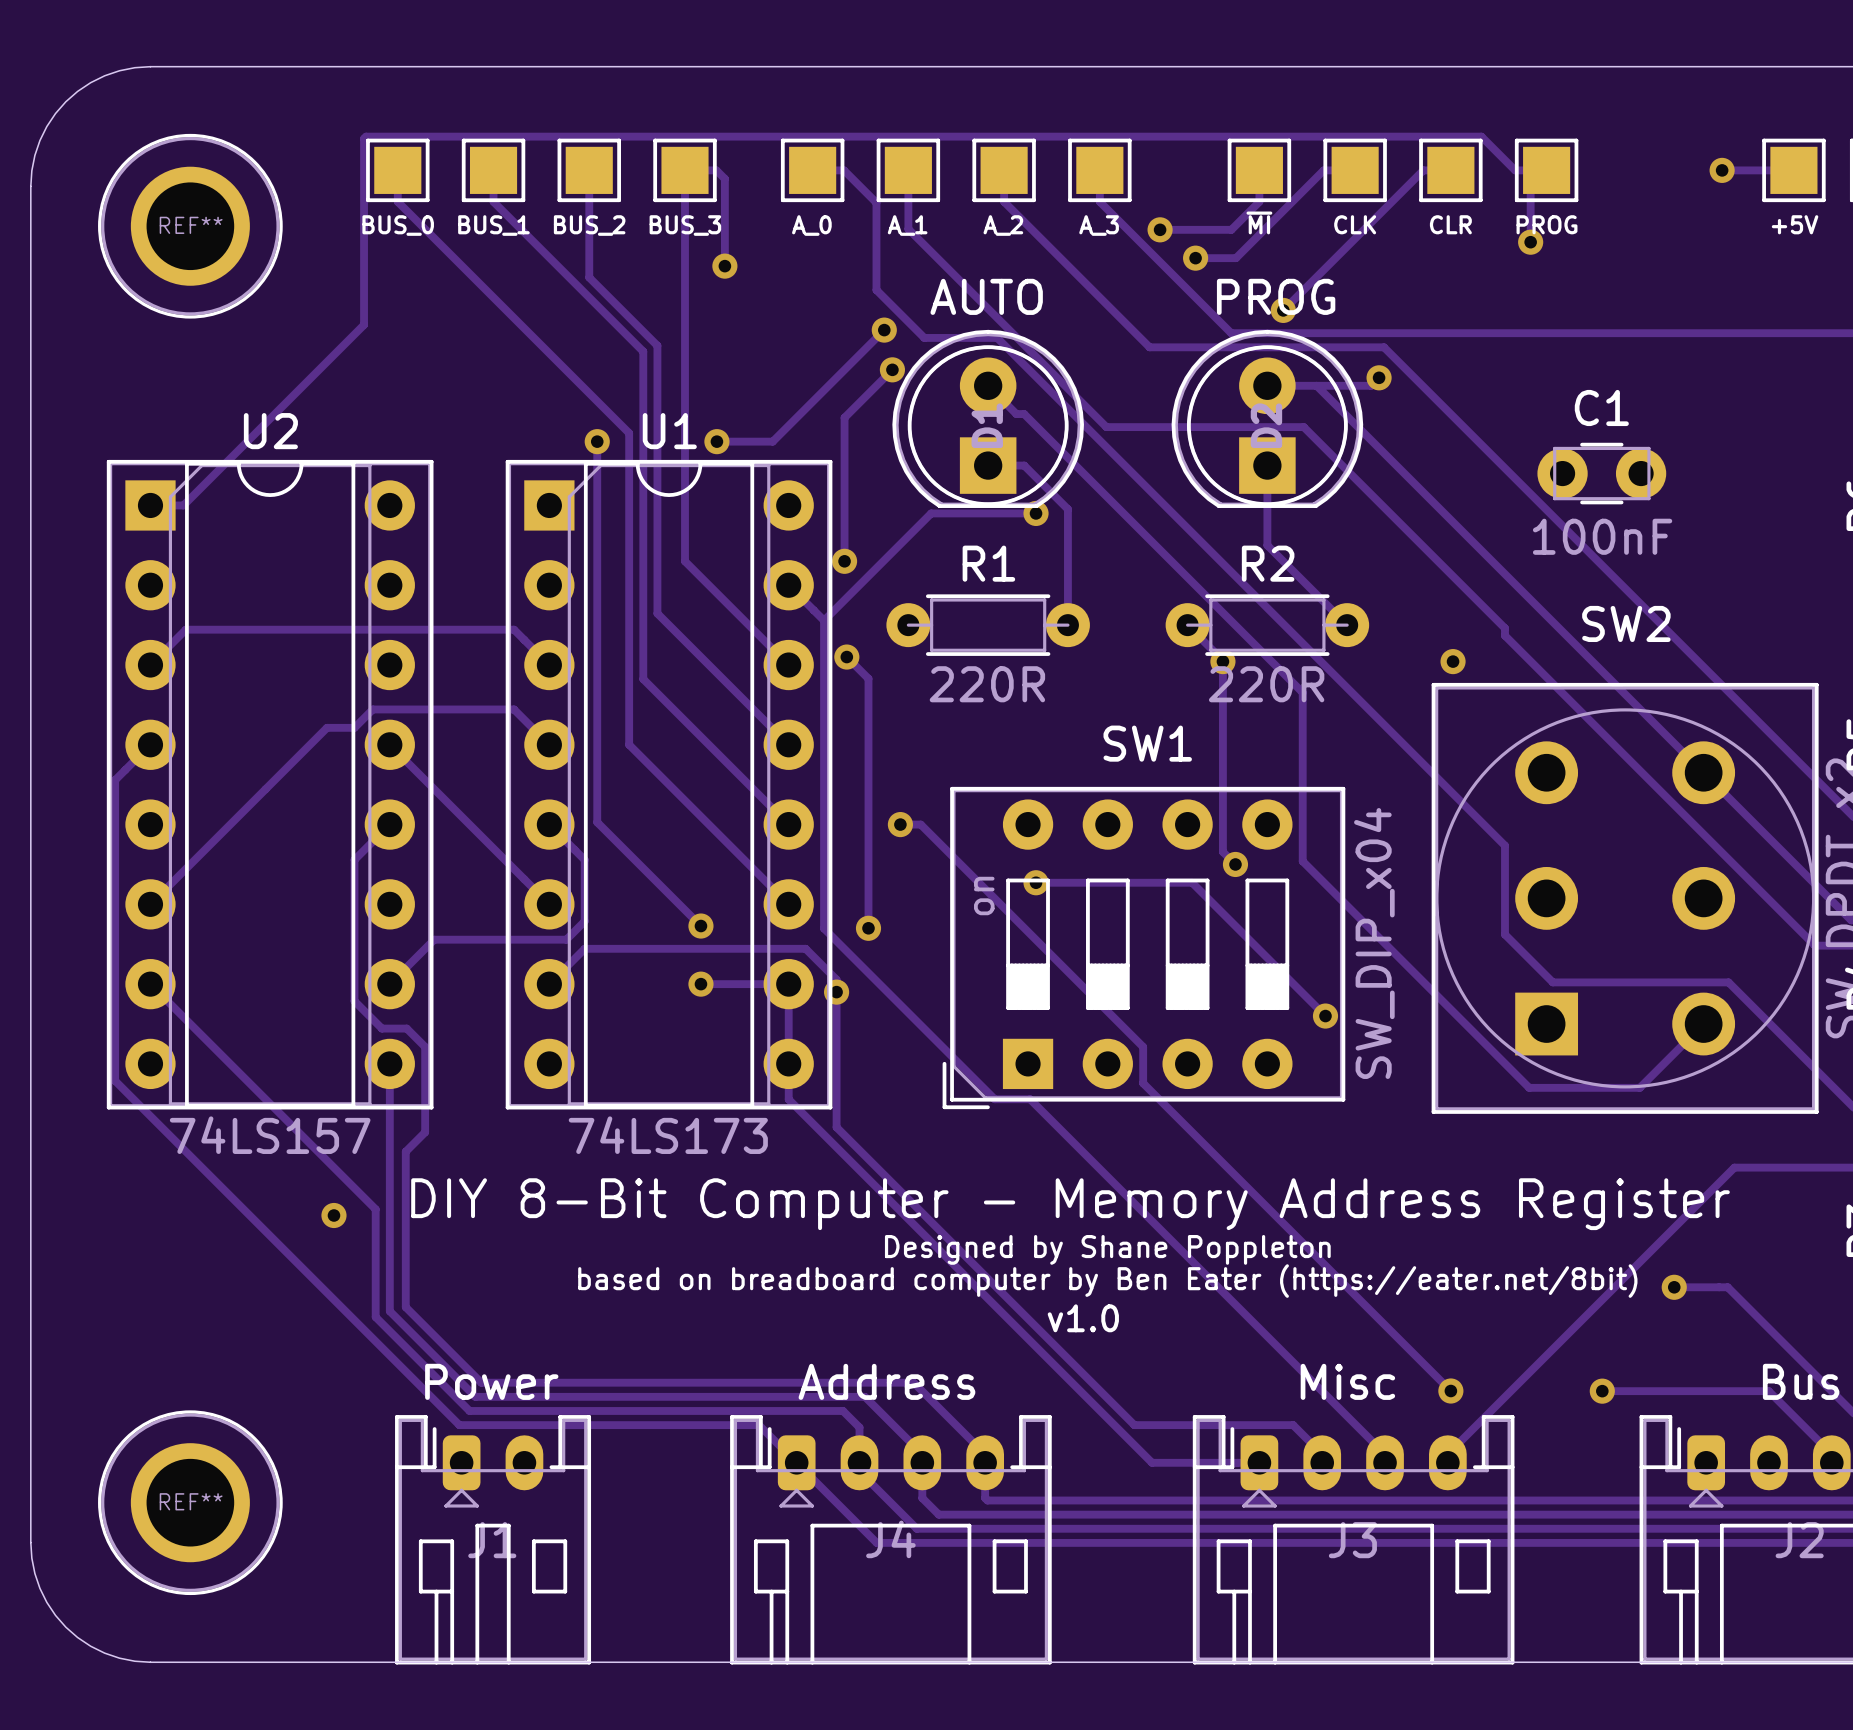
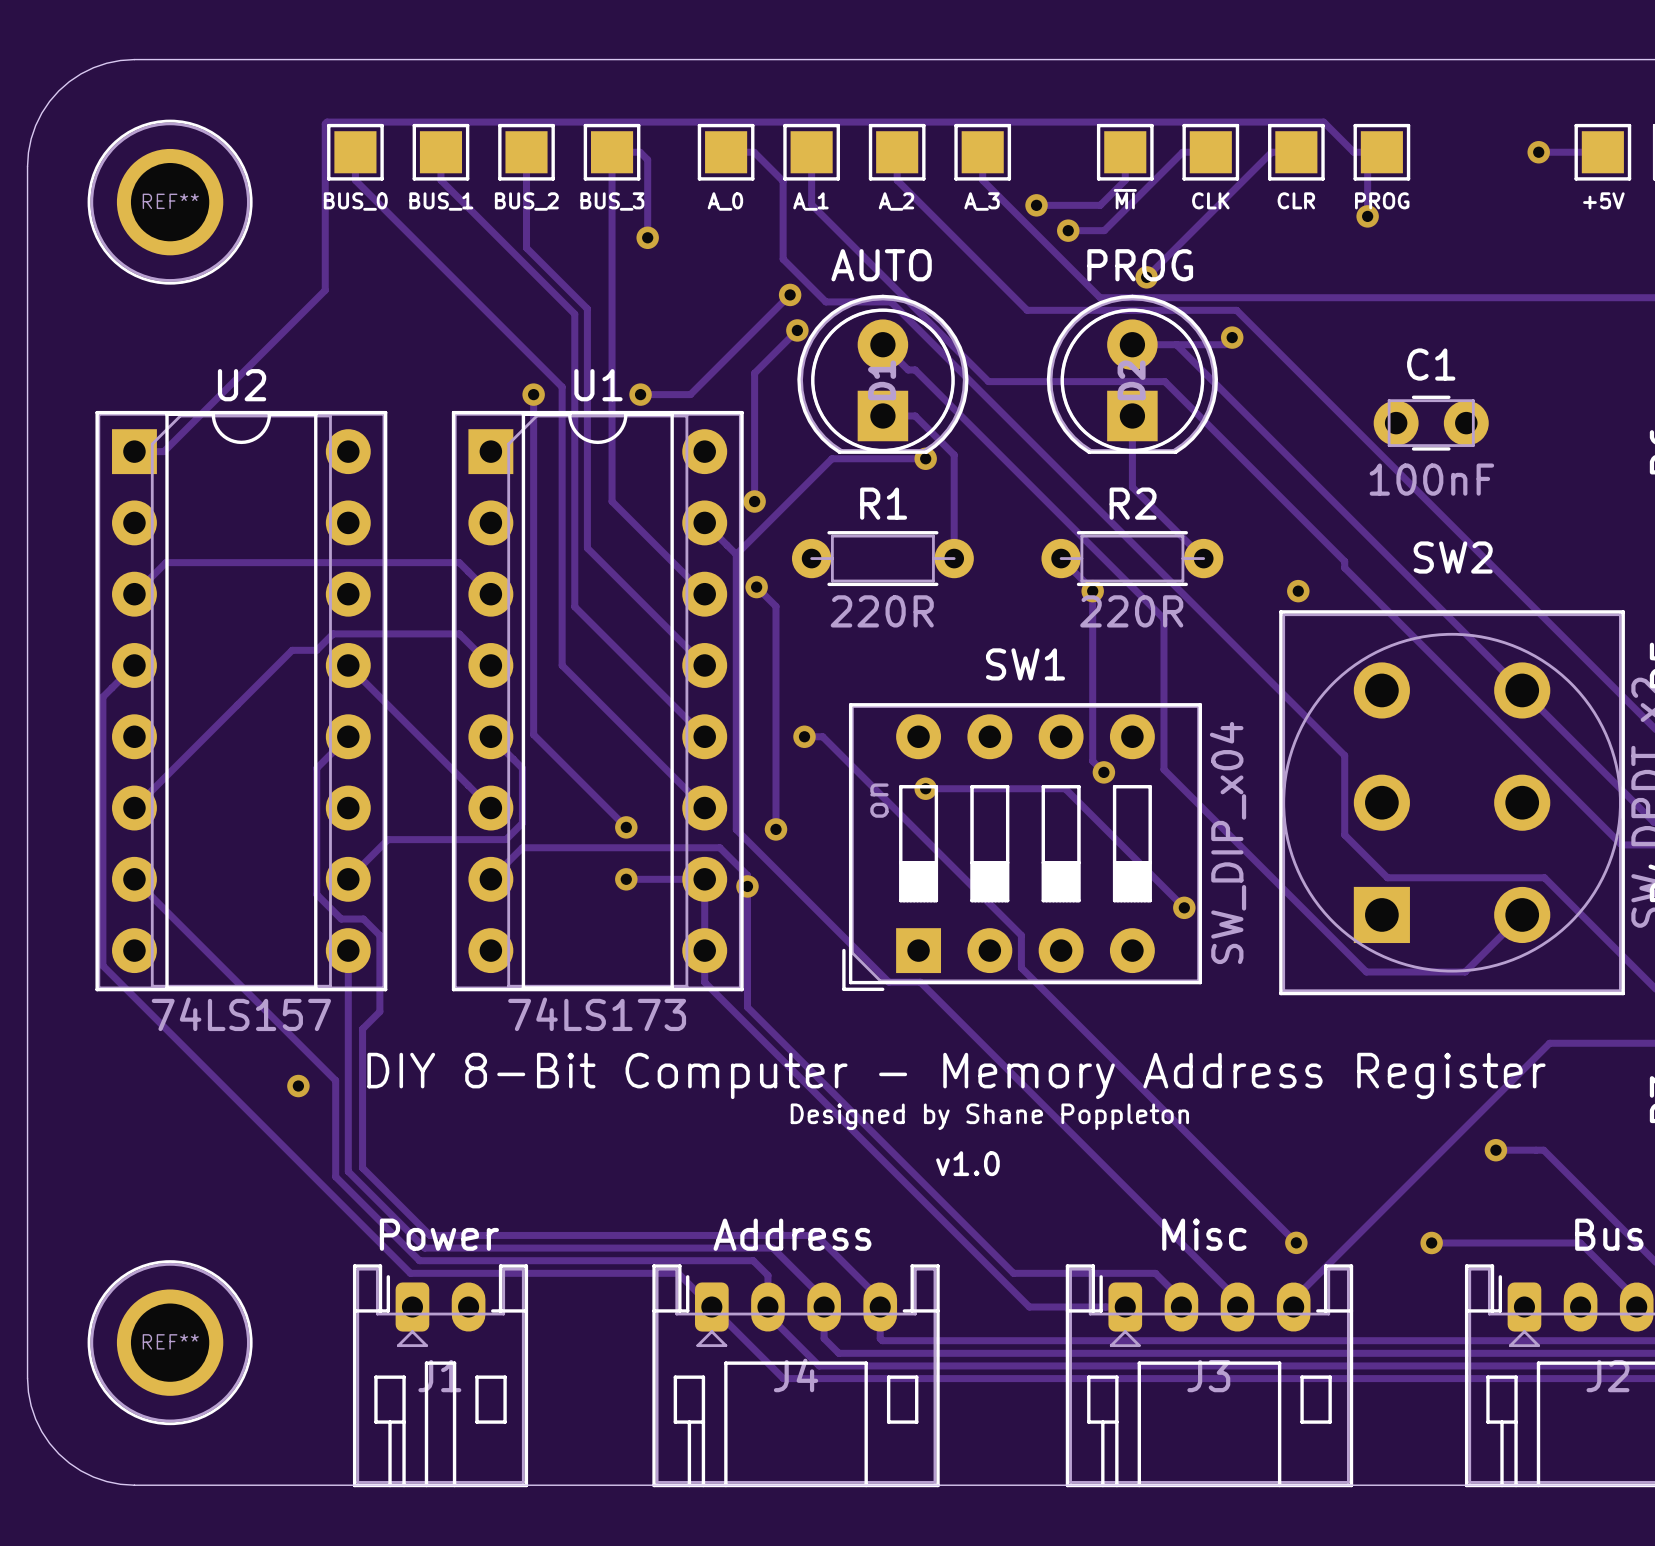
text: based on breadboard computer by Ben Eater (https://eater.net/8bit) (1107, 1281) -> none
text position: v1.0 (1083, 1318) -> v1.0 (967, 1163)

